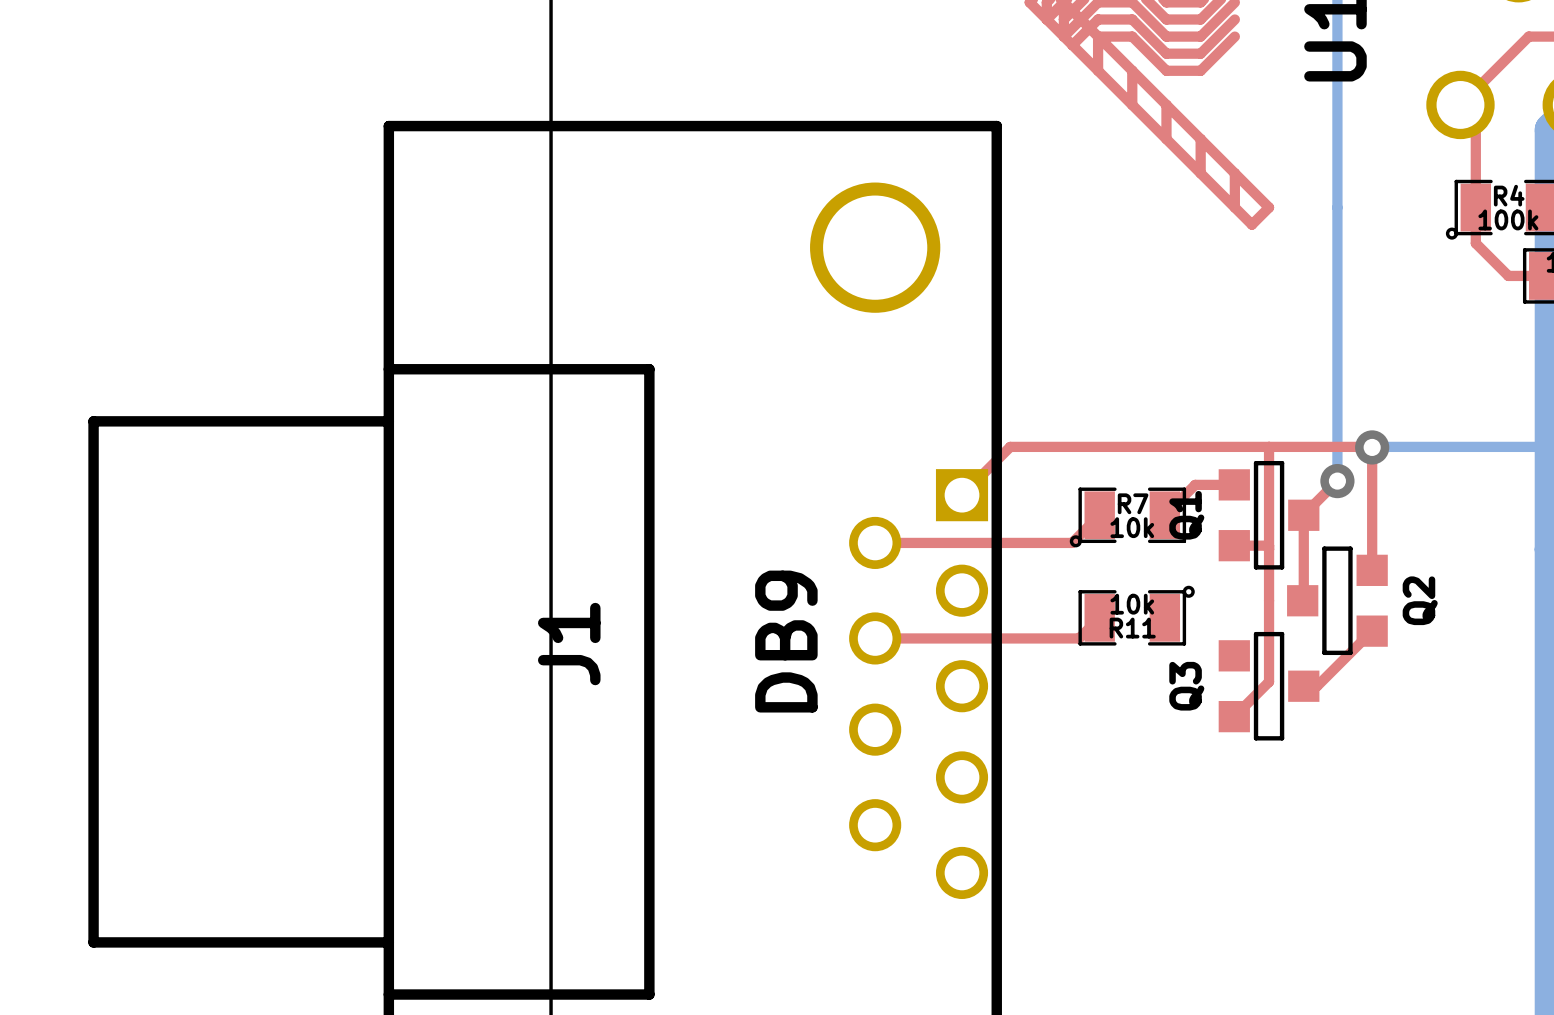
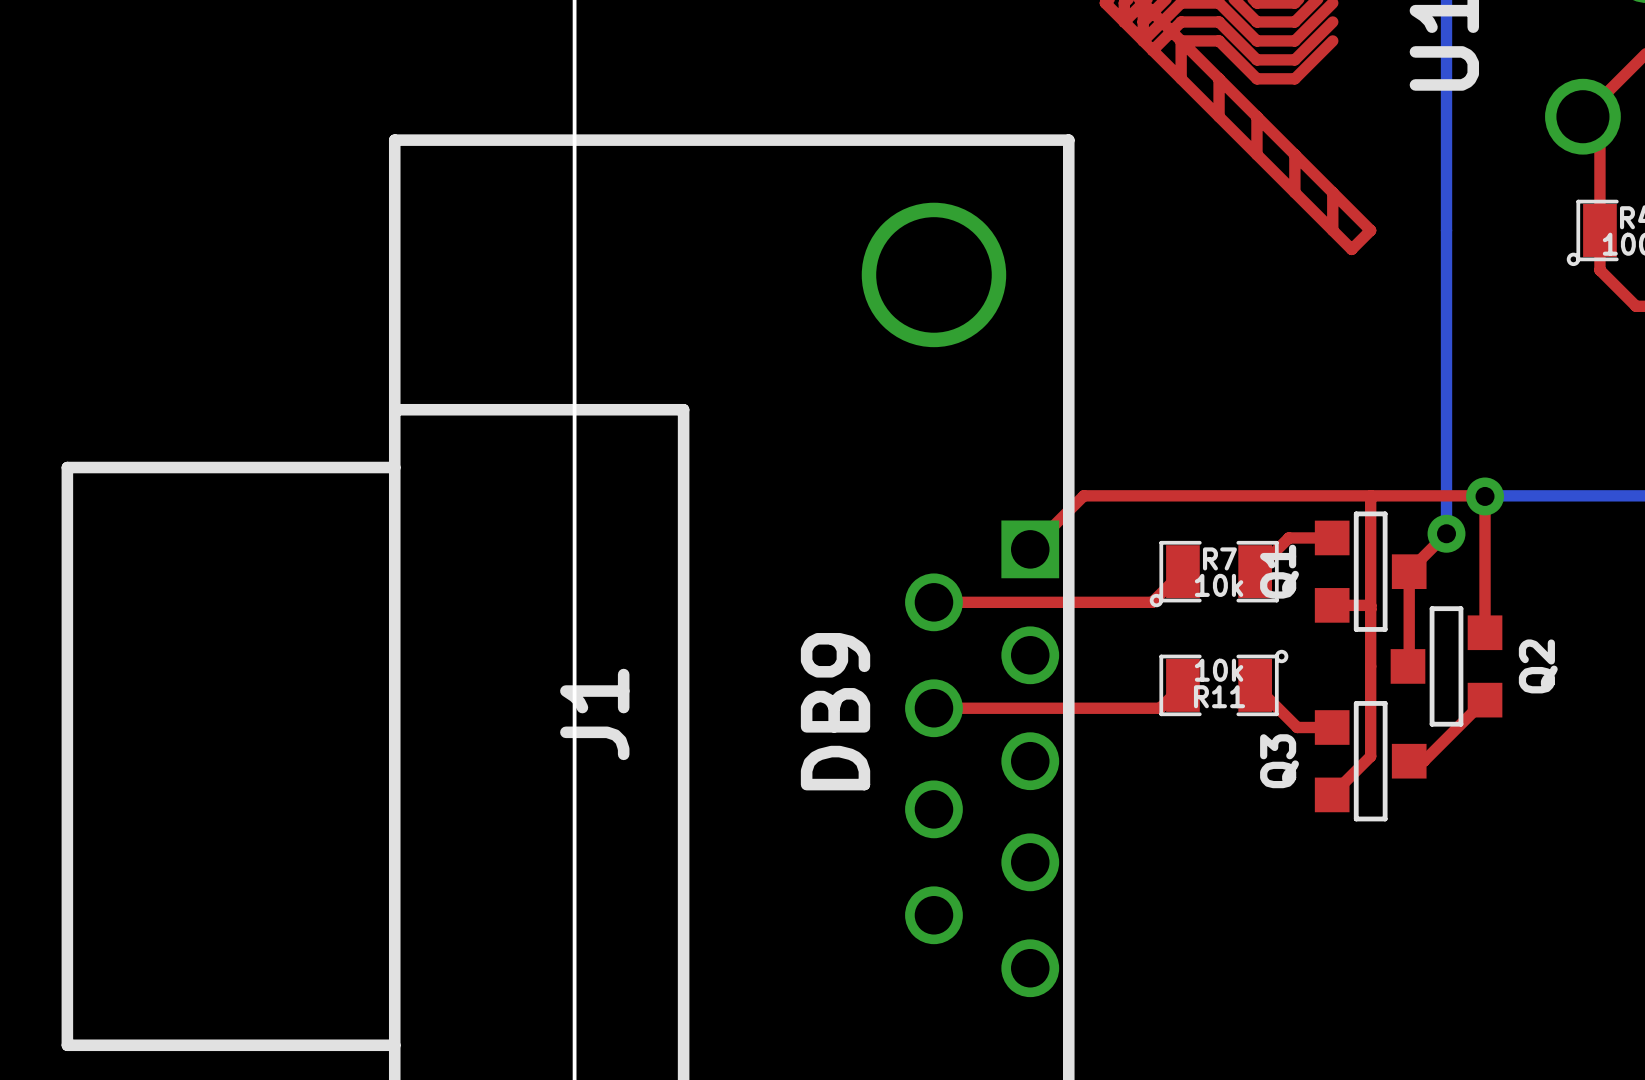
top track: none -> (1255, 685) (1297, 727) (1332, 727)

